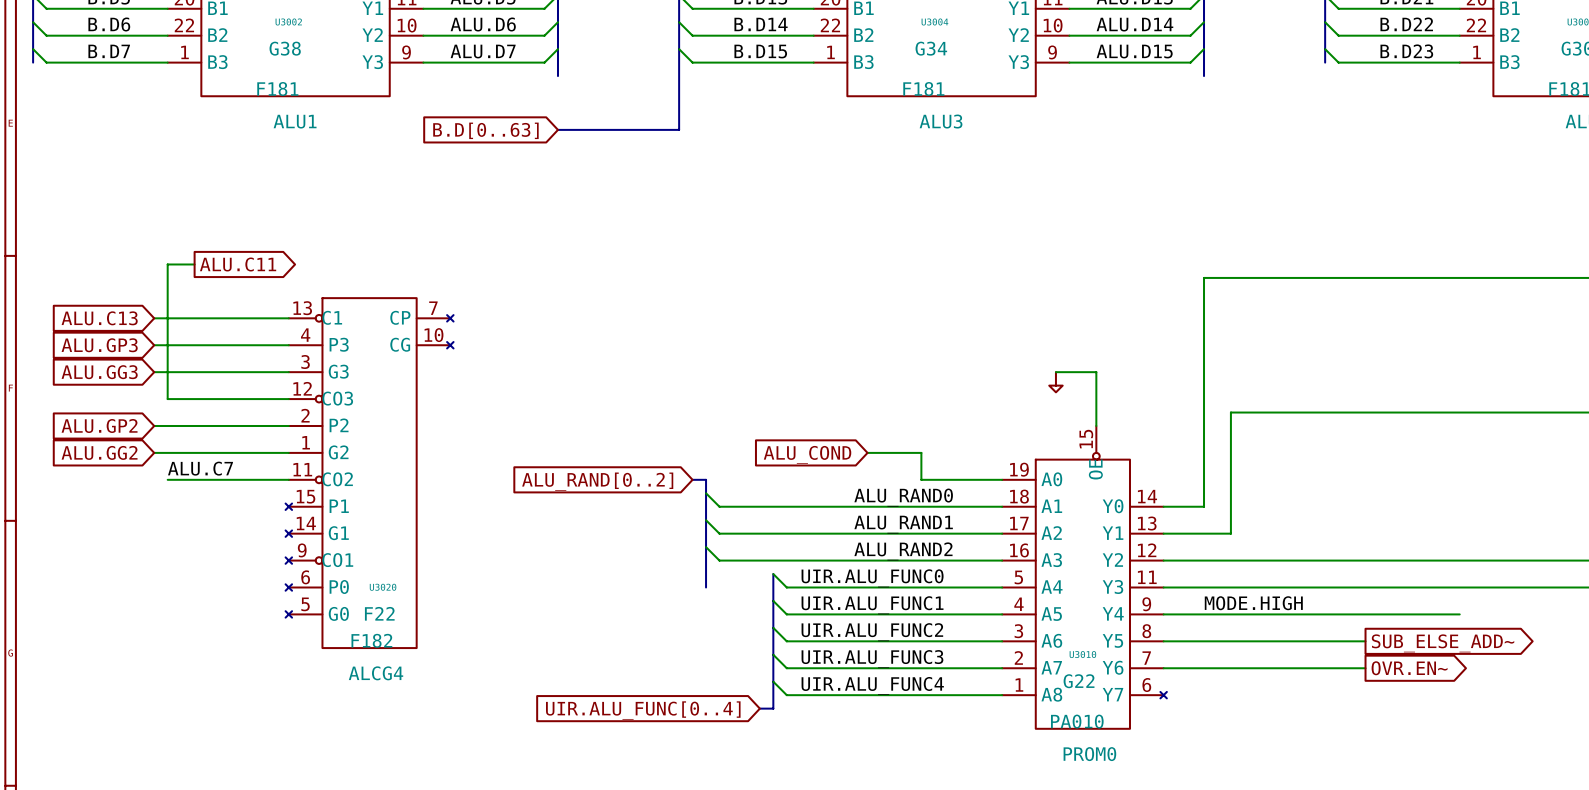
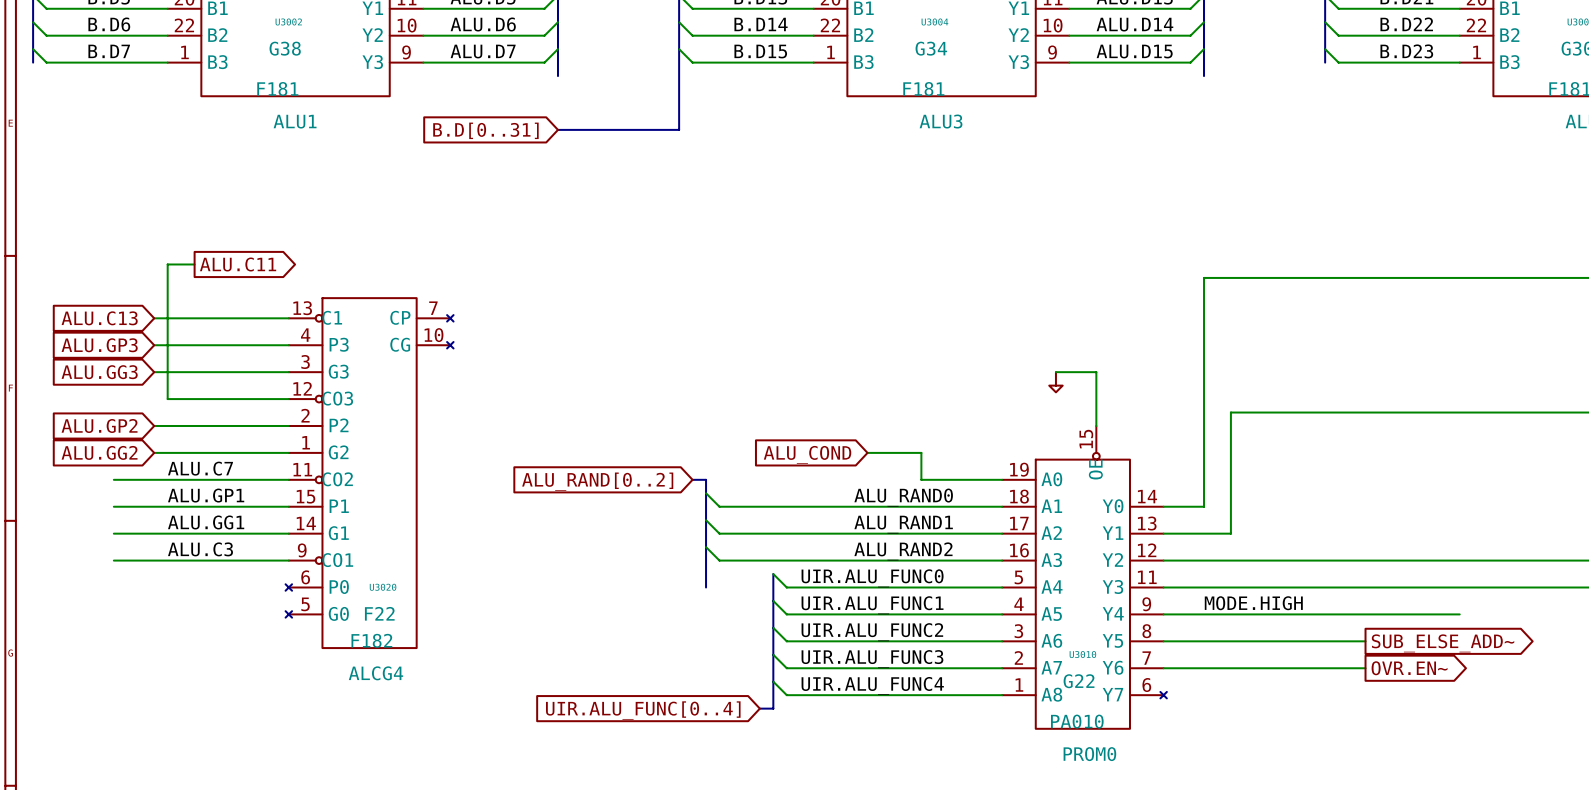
global label: B.D[0..63] (485, 130) -> B.D[0..31] (485, 130)
wire: none -> (113, 479) (167, 479)
label: none -> ALU.GP1 (206, 495)
wire: none -> (113, 506) (288, 506)
no-connect mark: (288, 506) -> none
label: none -> ALU.GG1 (206, 522)
wire: none -> (113, 533) (288, 533)
no-connect mark: (288, 533) -> none
label: none -> ALU.C3 (200, 549)
wire: none -> (113, 560) (288, 560)
no-connect mark: (288, 560) -> none

